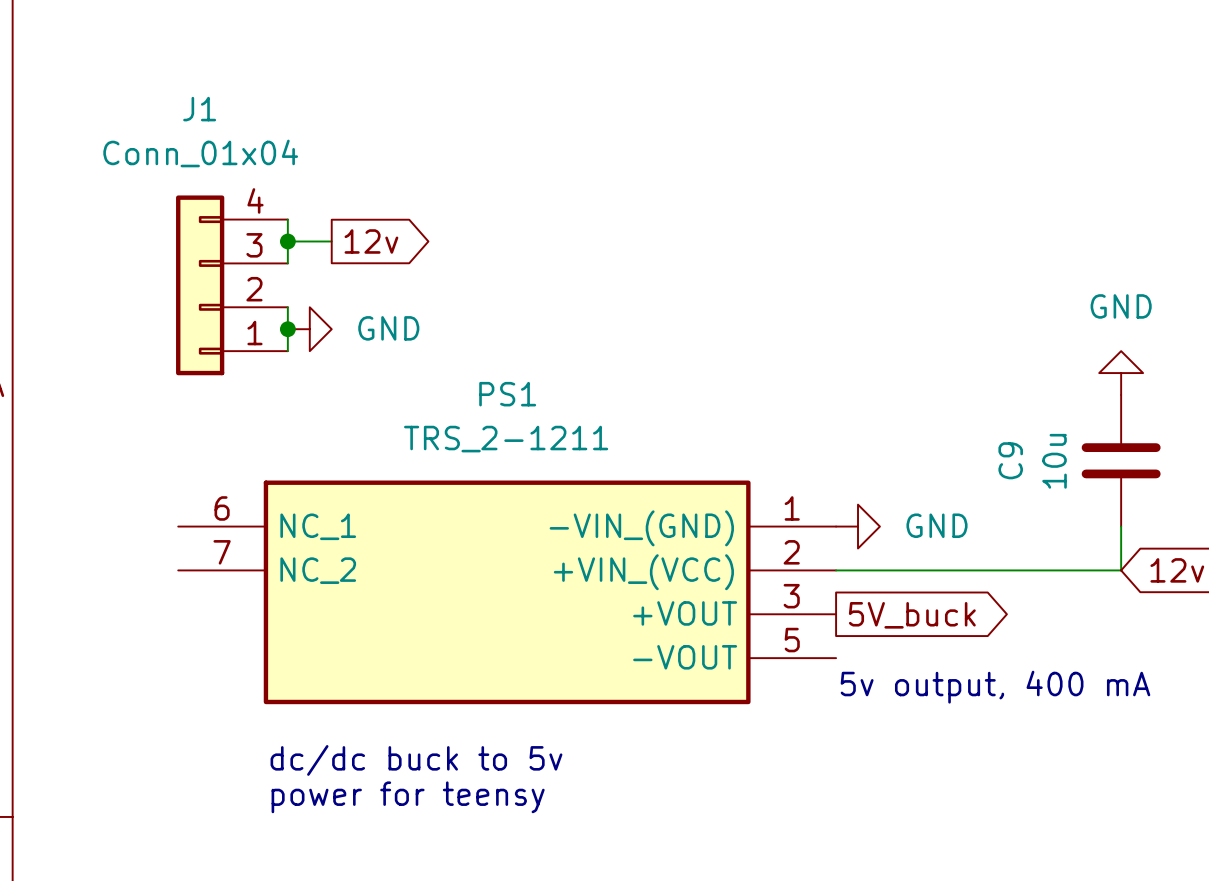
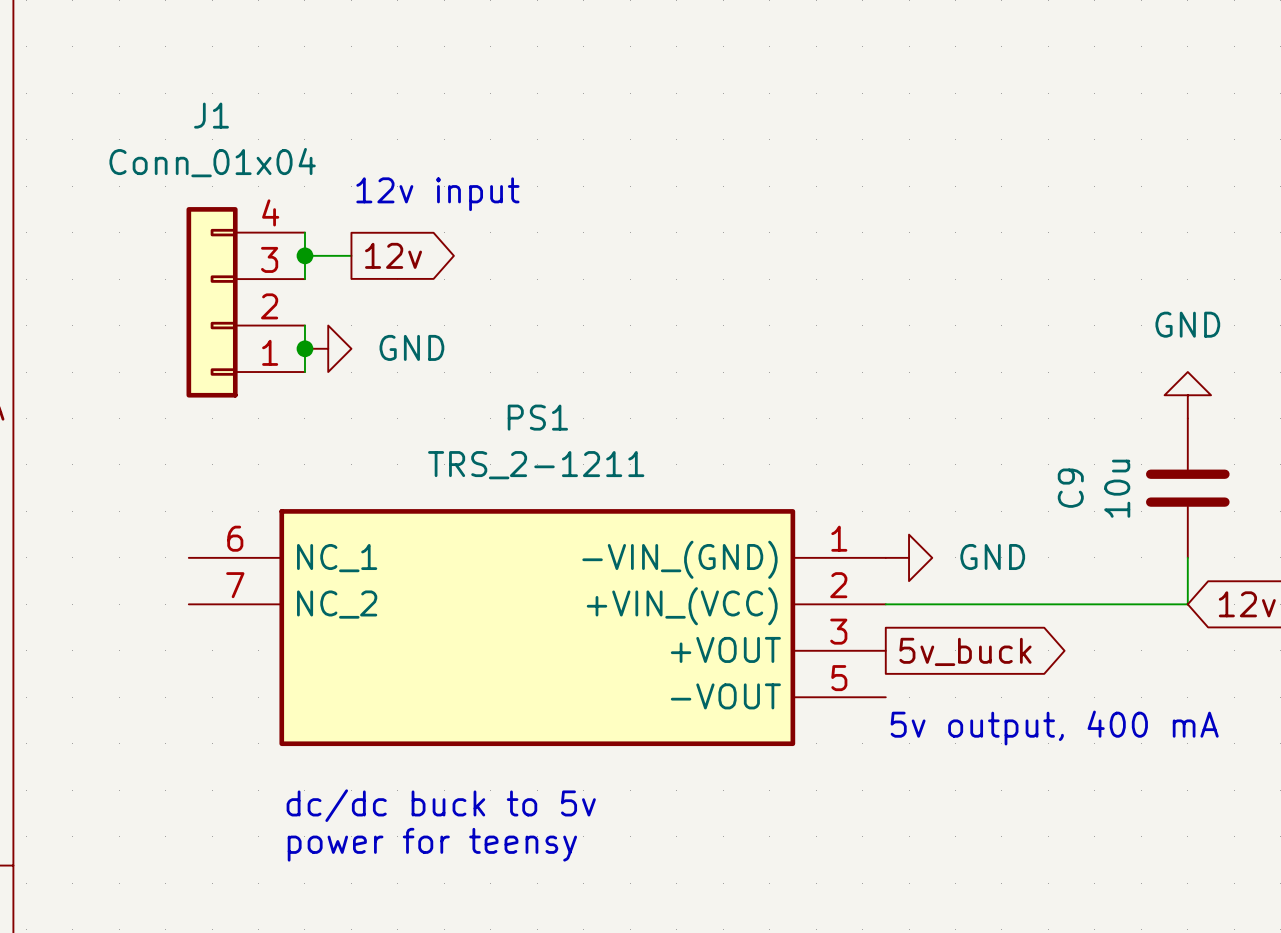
text: none -> 12v input (437, 194)
global label: 5V_buck (912, 615) -> 5v_buck (965, 651)

